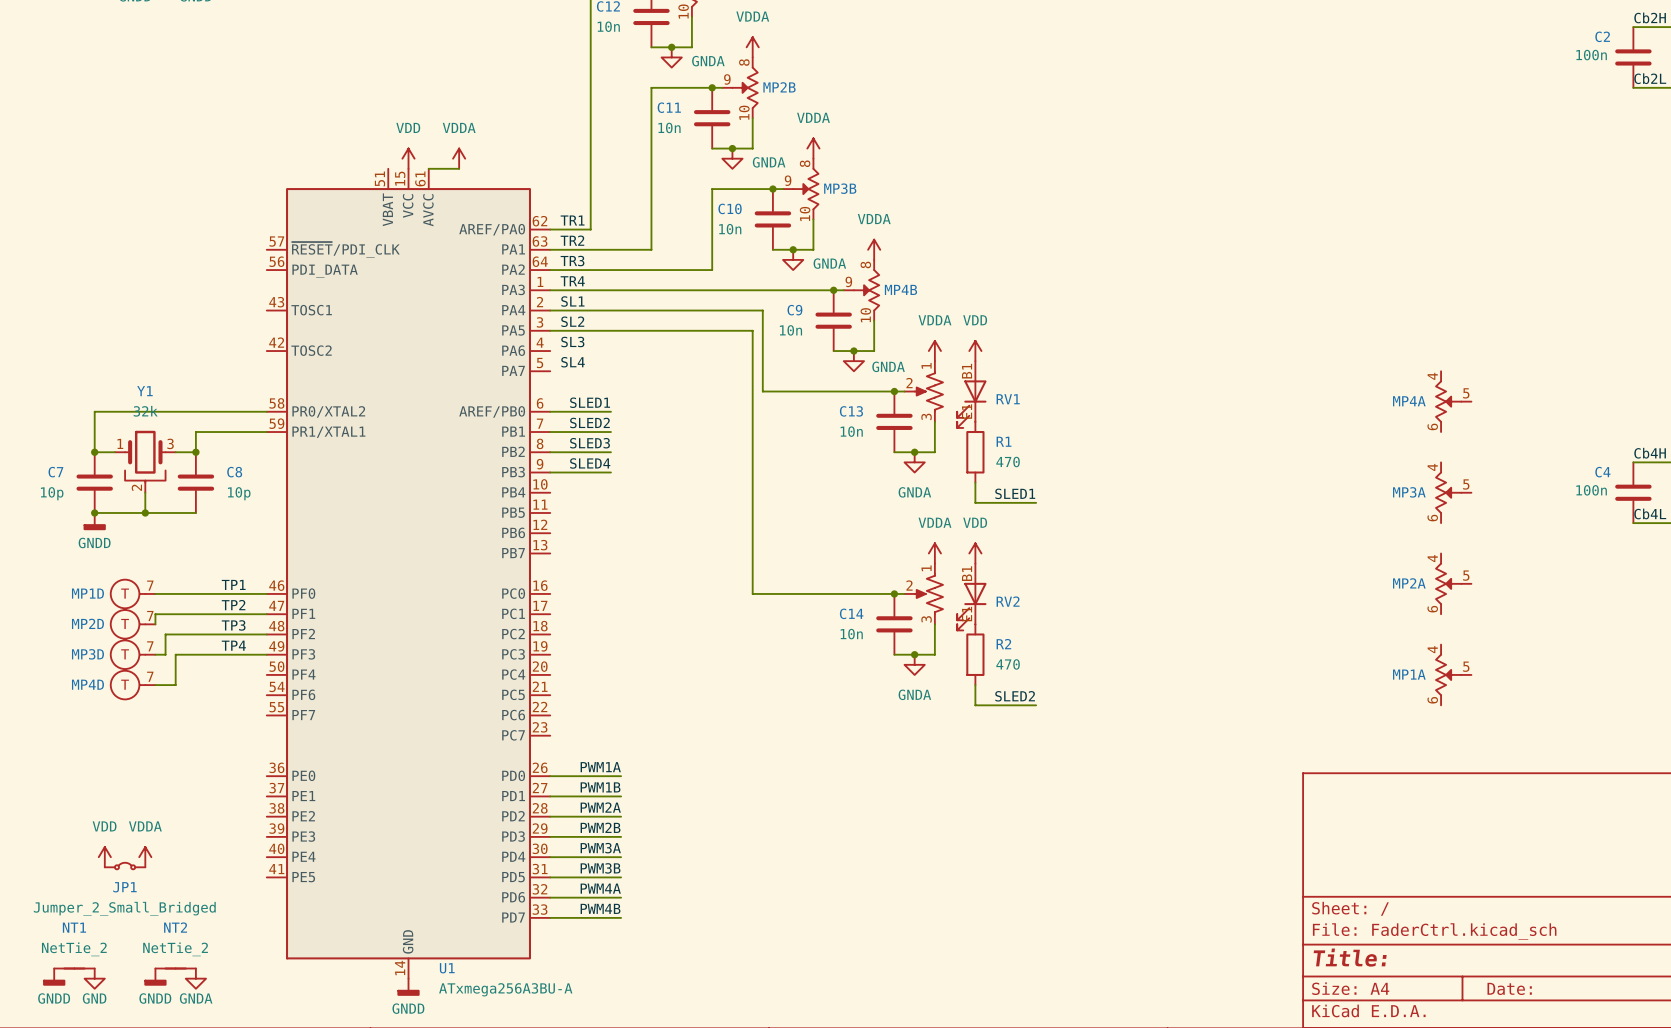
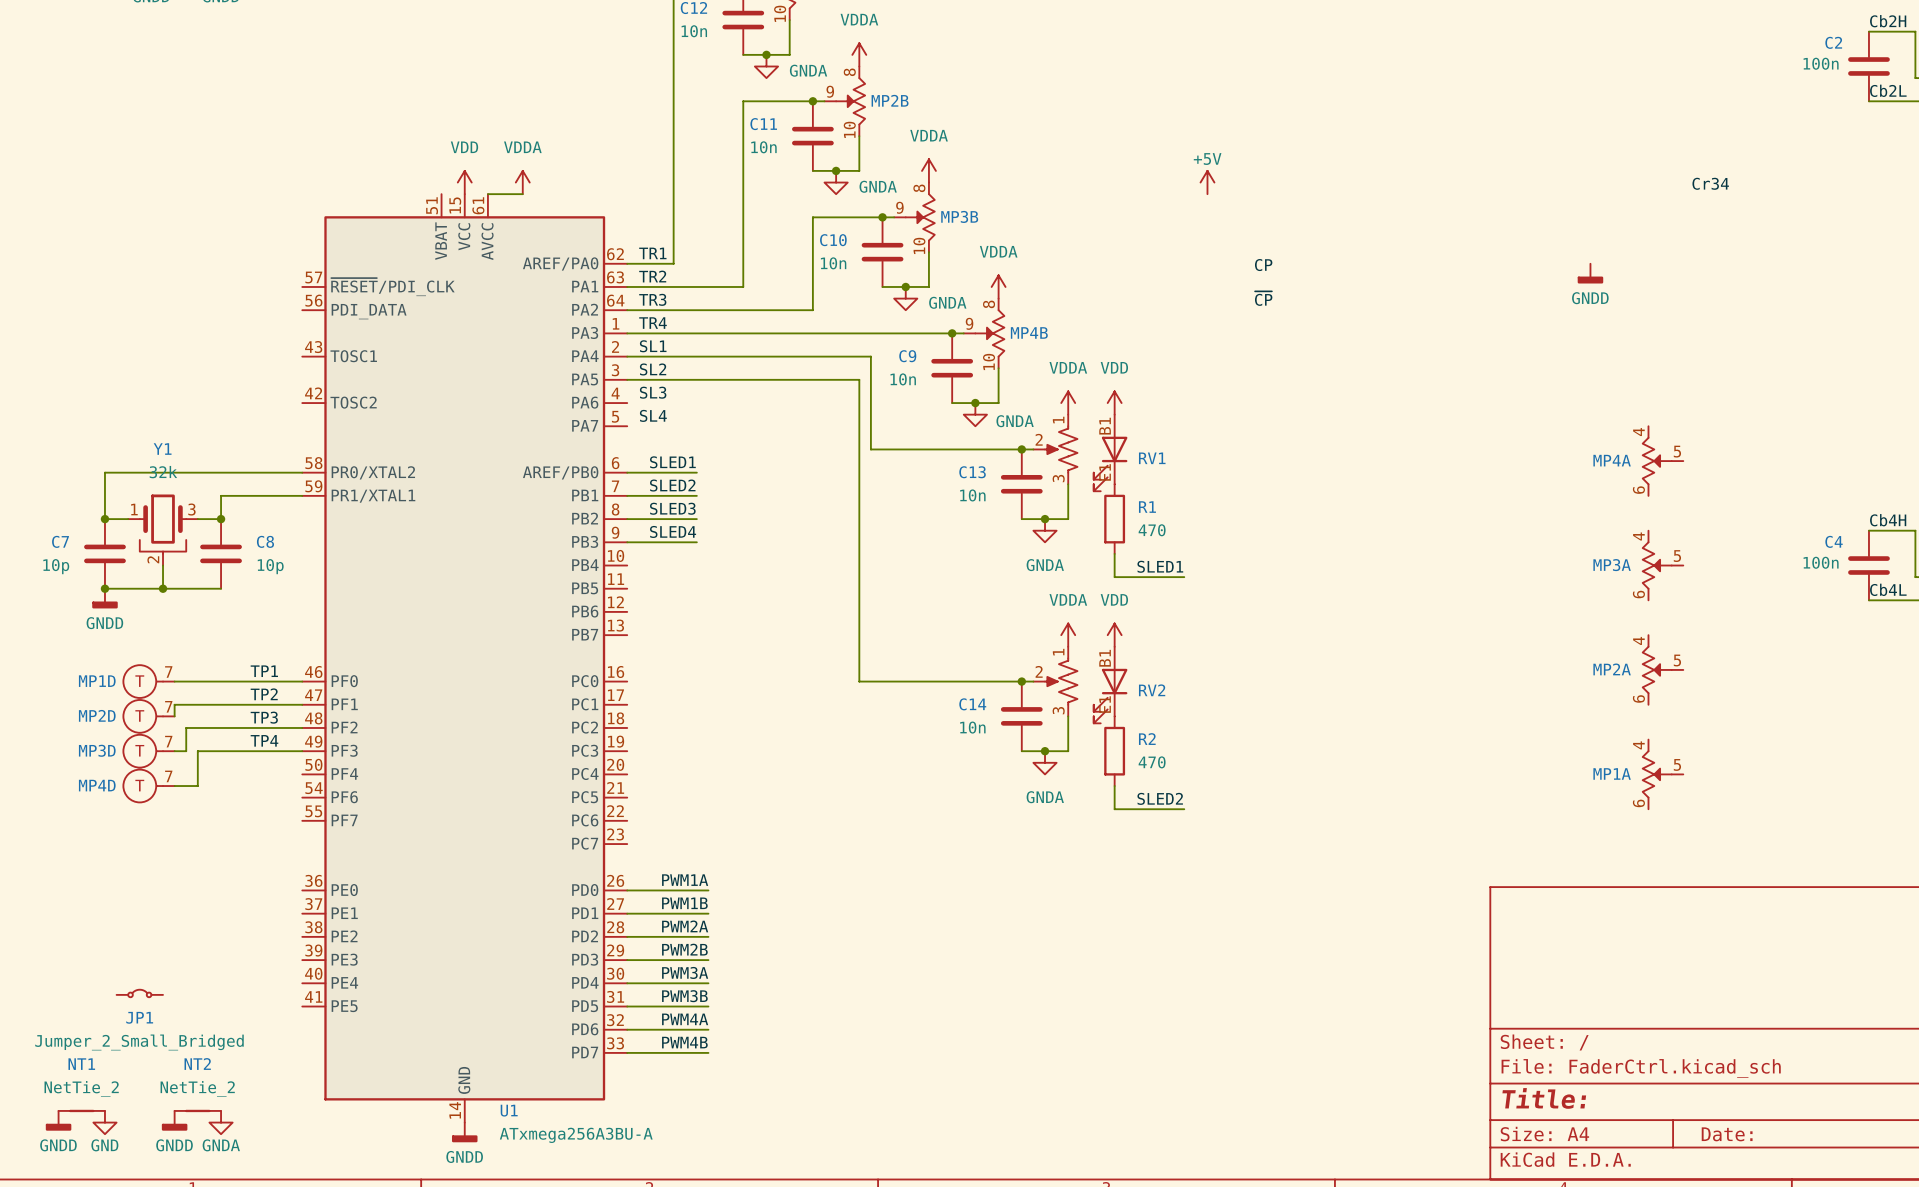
power symbol: none -> +5V (1207, 182)
label: none -> Cr34 (1710, 183)
label: none -> CP (1263, 265)
power symbol: none -> GNDD (1590, 273)
label: none -> ~{CP} (1263, 298)
power symbol: VDD (104, 857) -> none
power symbol: VDDA (145, 857) -> none

